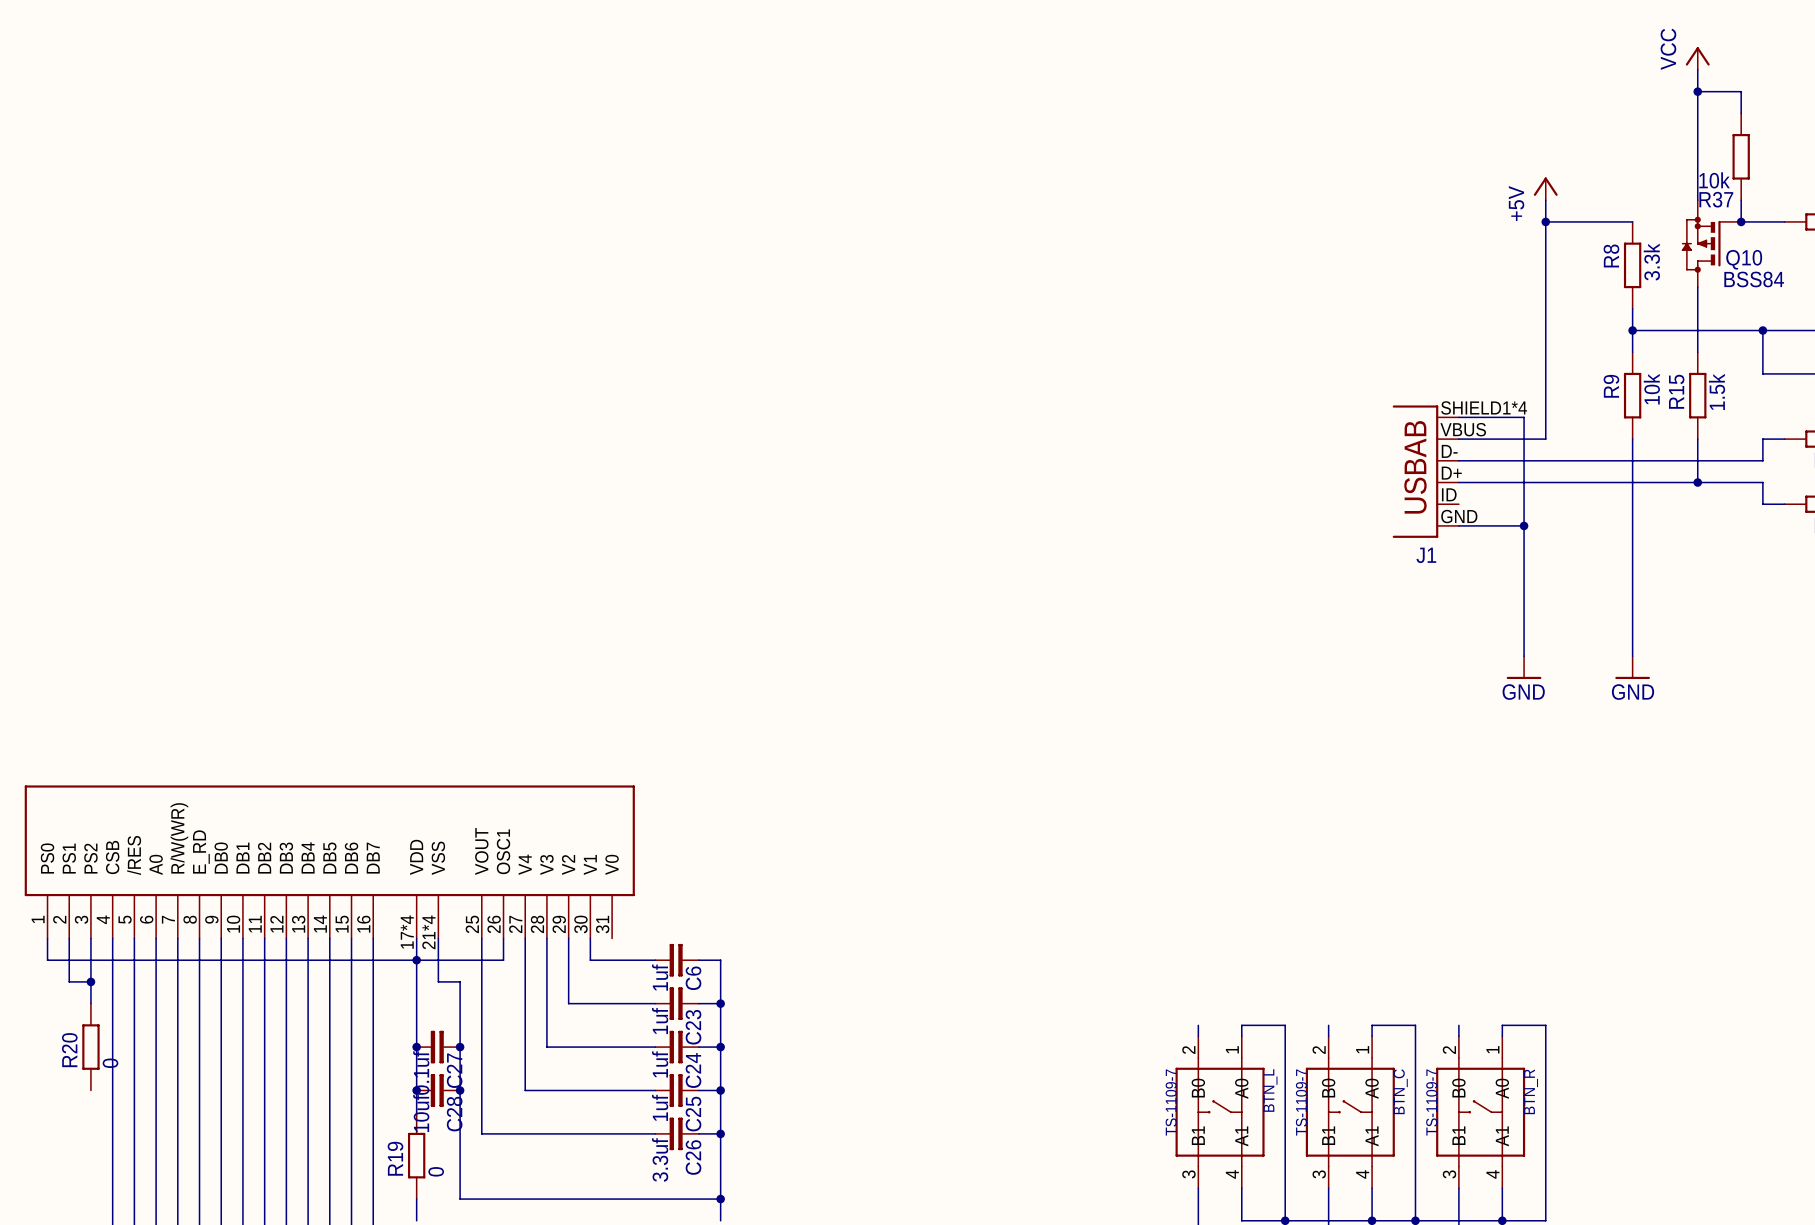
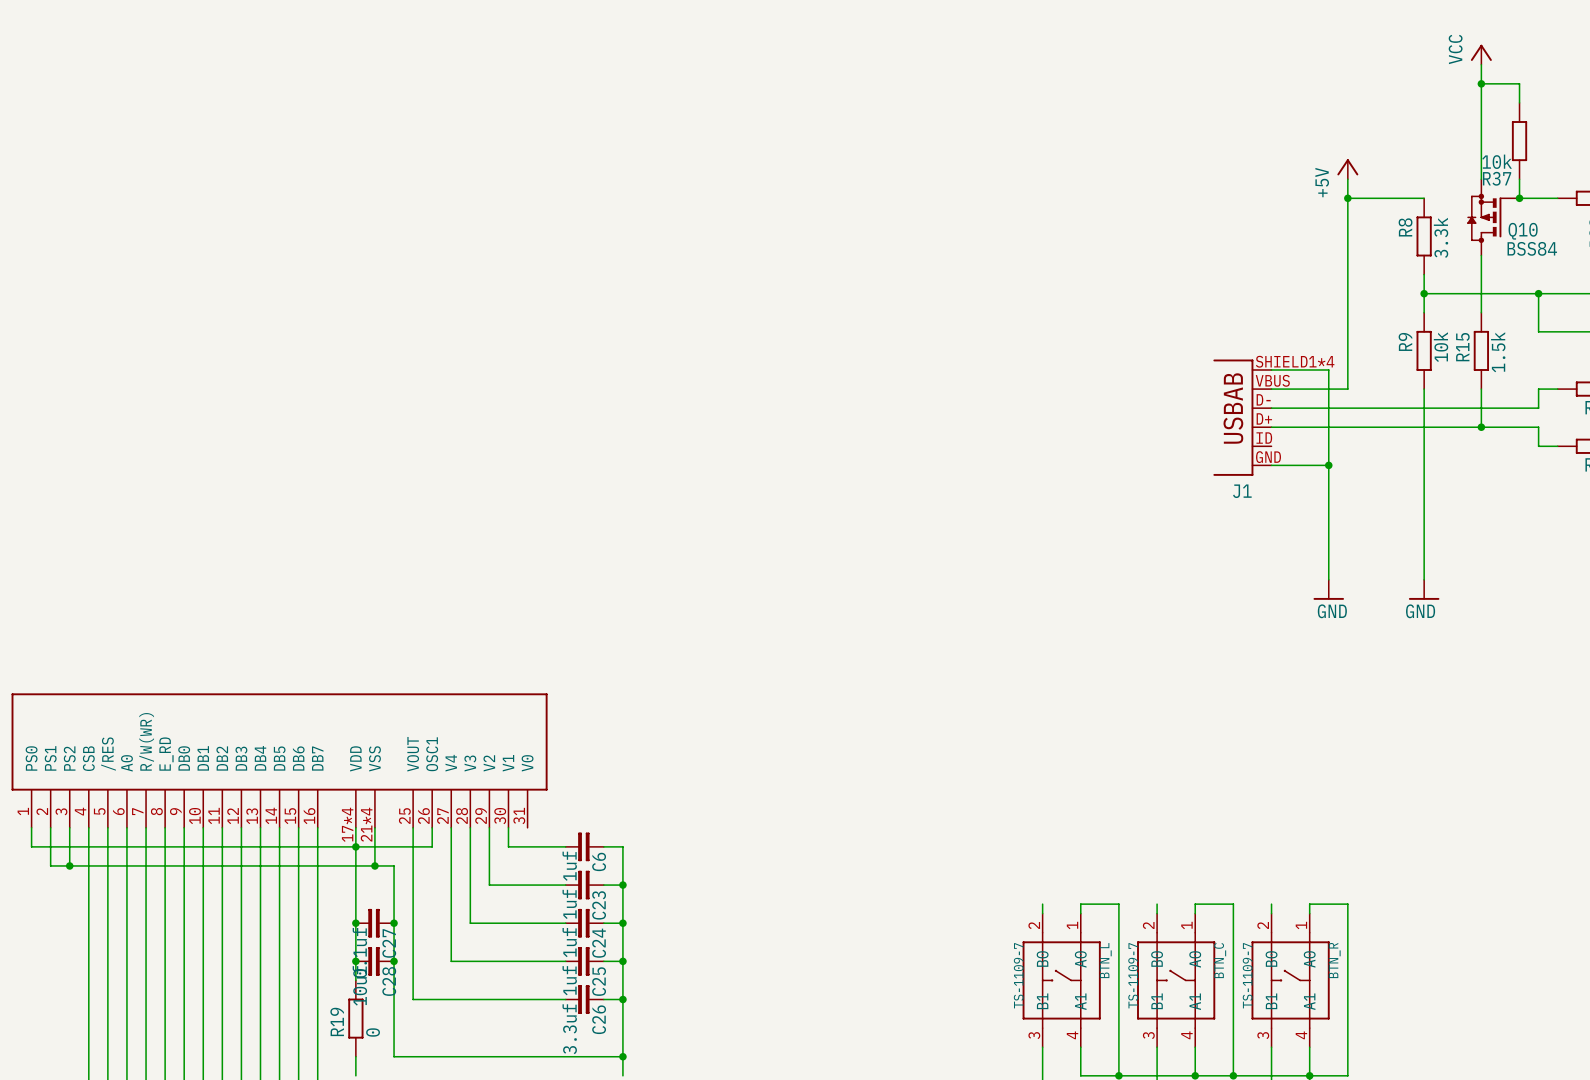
wire: (90, 981) (90, 1003) -> (69, 865) (374, 865)
junction: none -> (374, 865)
R20: 0 (90, 1047) -> none

